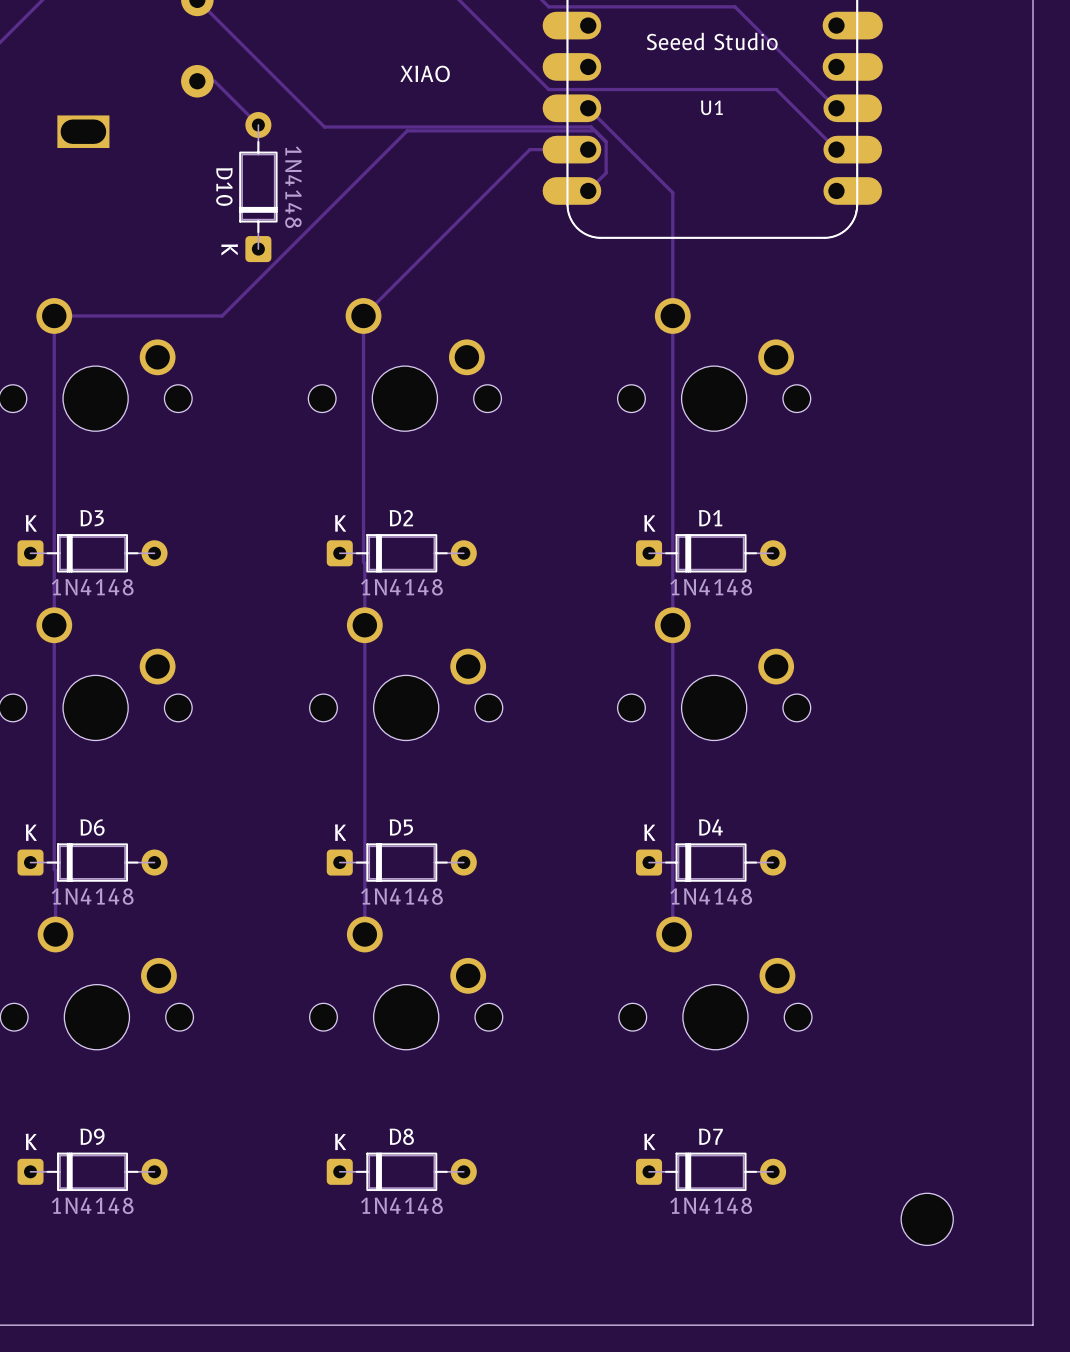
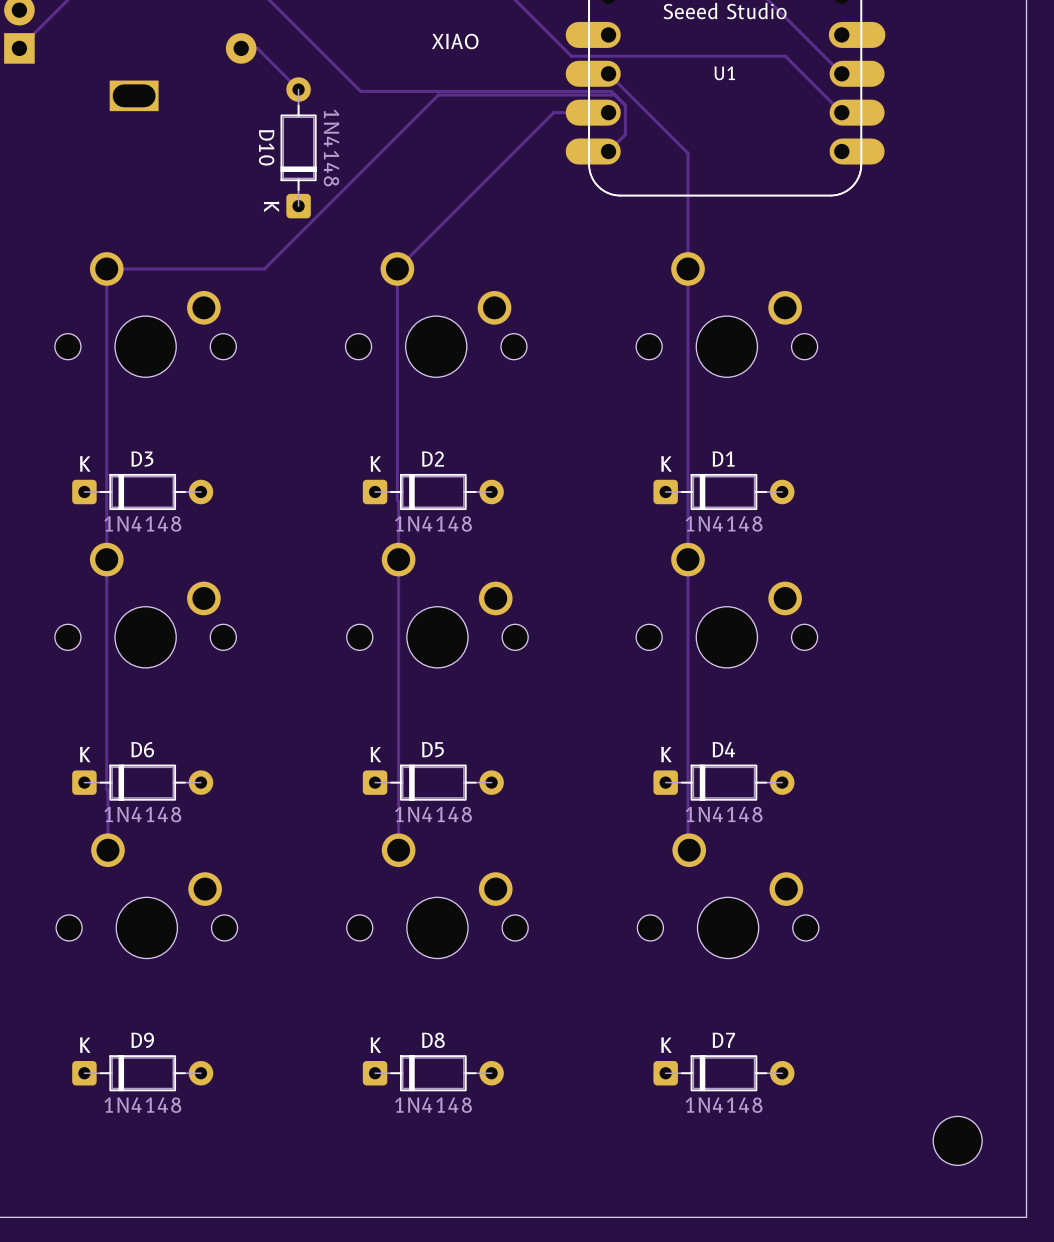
part position: (927, 1219) -> (957, 1140)

